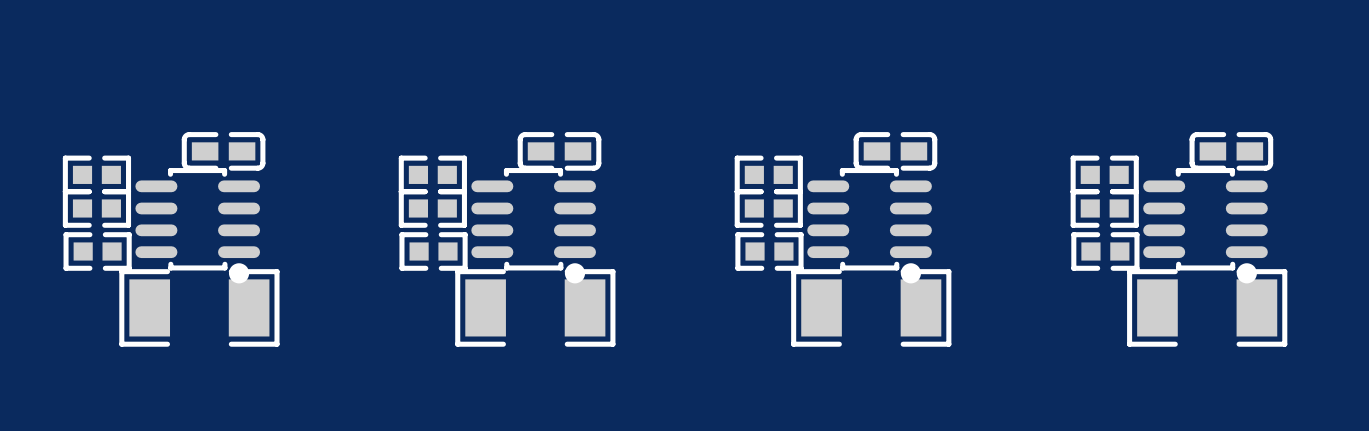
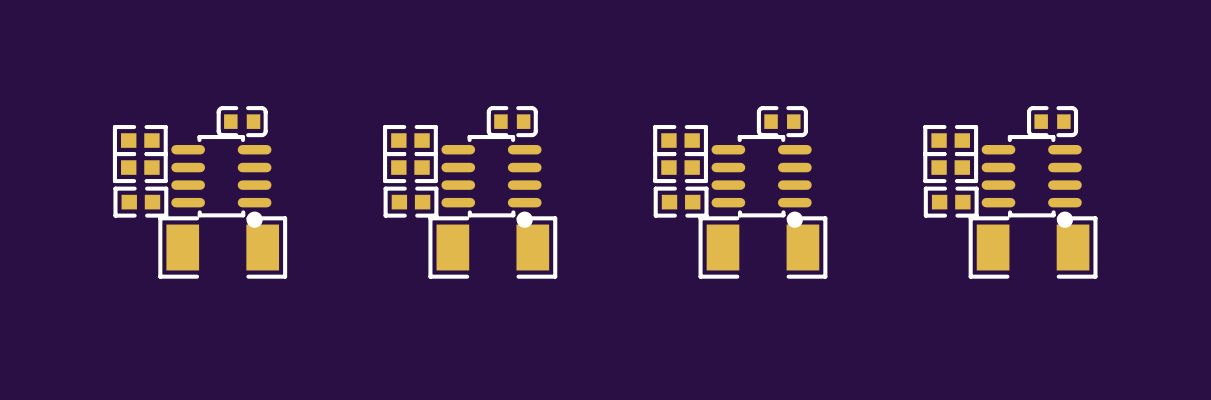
part footprint: [181, 132, 266, 171] -> [216, 106, 268, 138]
part footprint: [517, 132, 602, 171] -> [486, 106, 538, 138]
part footprint: [853, 132, 938, 171] -> [756, 106, 808, 138]
part footprint: [1189, 132, 1274, 171] -> [1026, 106, 1079, 138]

